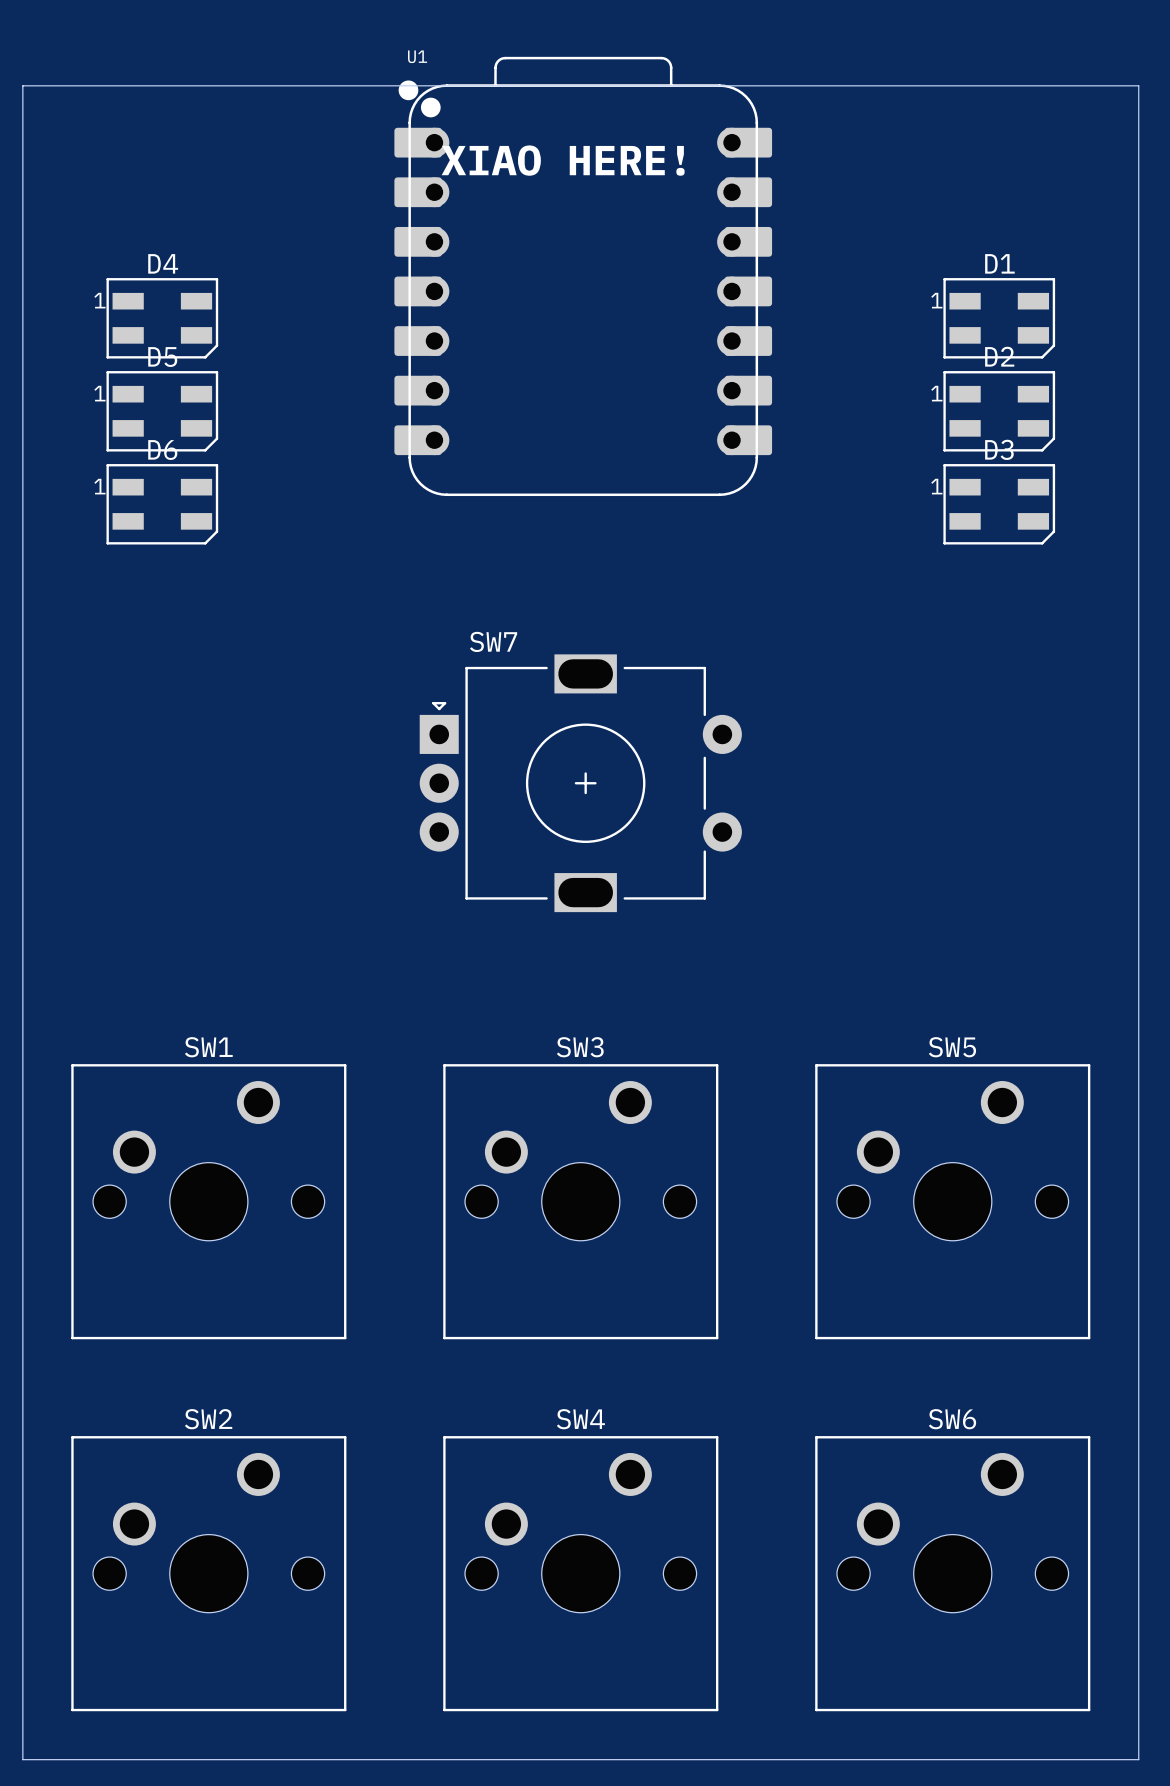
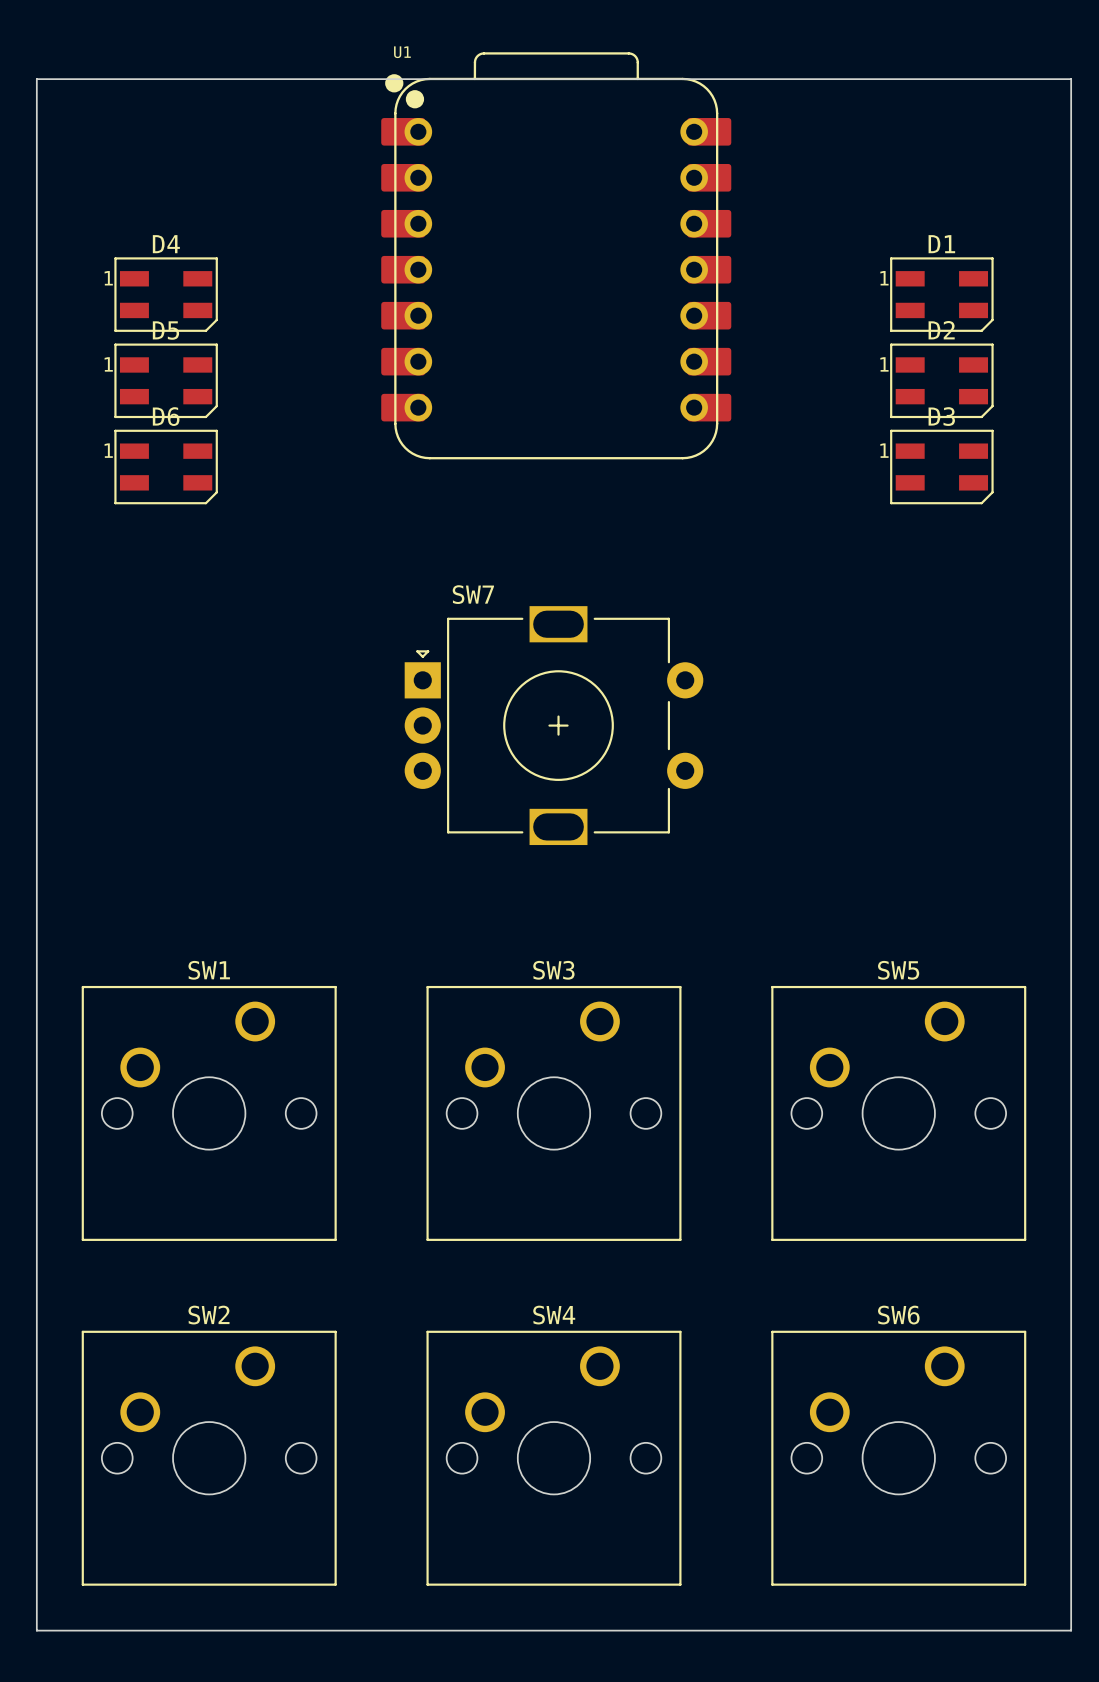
text: XIAO HERE! (563, 160) -> none

